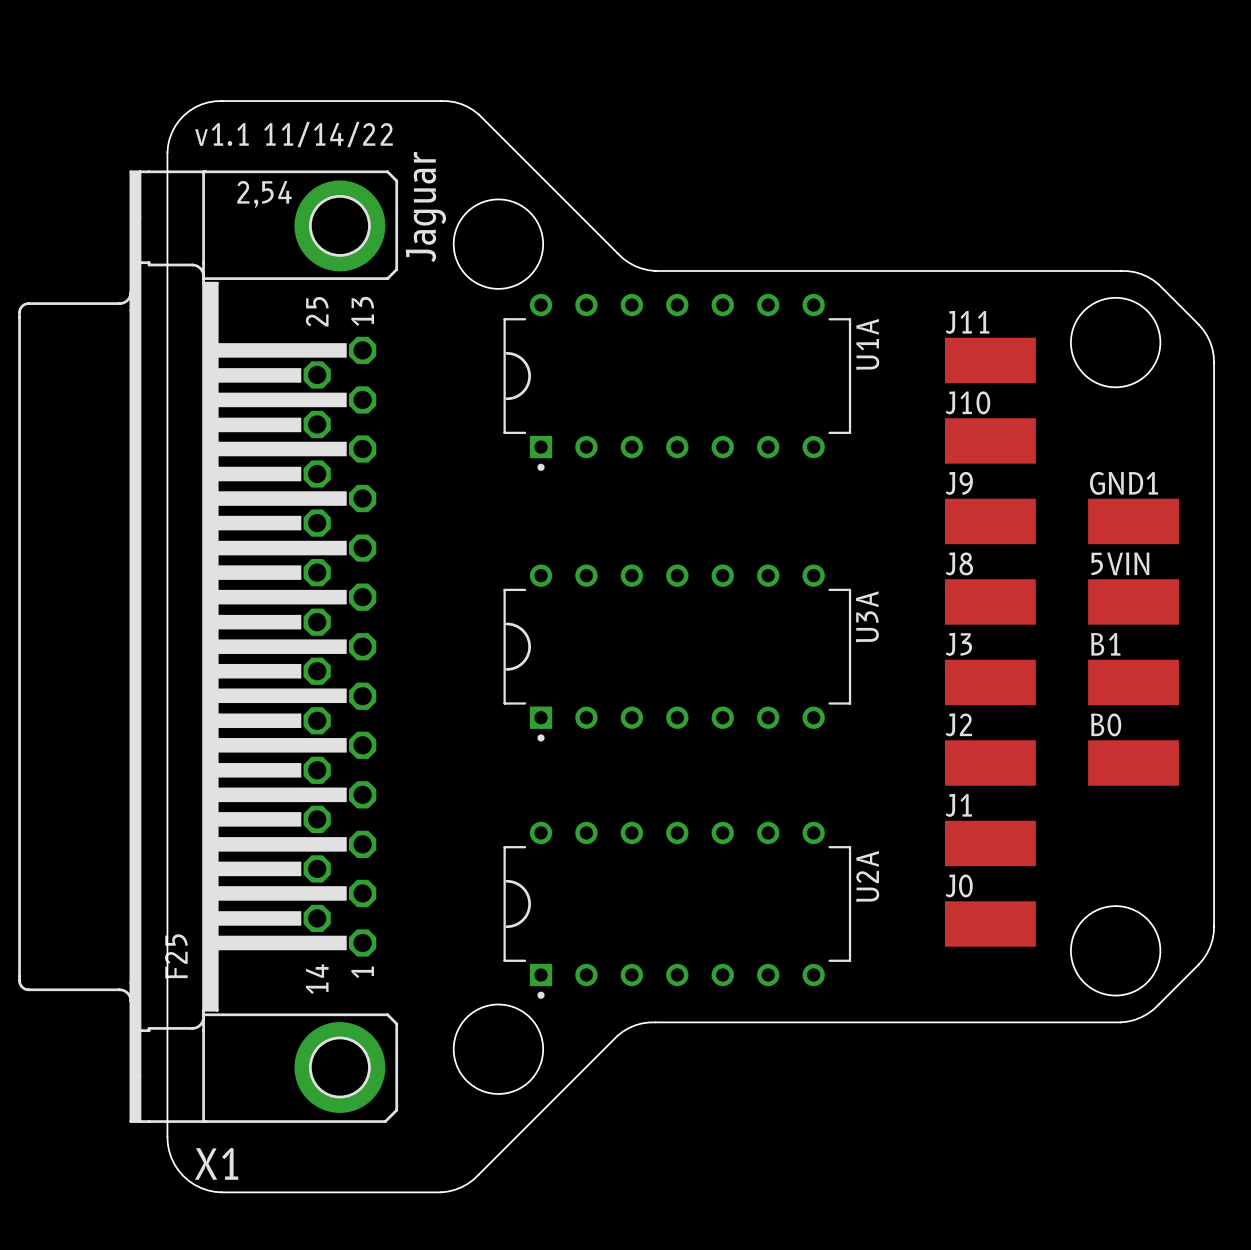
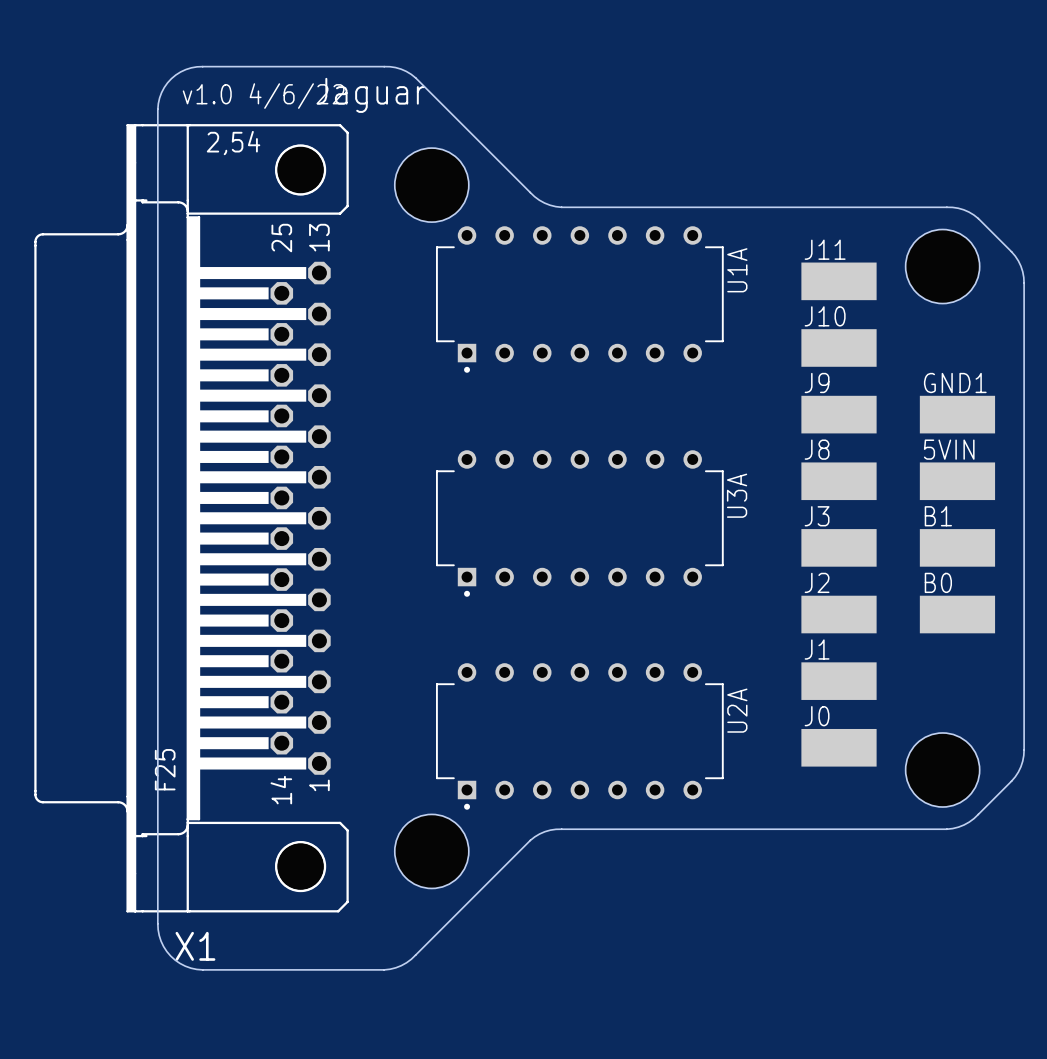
text: v1.1 11/14/22 (294, 134) -> v1.0 4/6/22 (263, 96)
X1 footprint: [18, 170, 399, 1123] -> [34, 124, 349, 913]
text rotation: 0° (425, 206) -> 90° clockwise (371, 95)
U1A footprint: [503, 293, 852, 471] -> [436, 226, 724, 373]
U3A footprint: [503, 564, 852, 742] -> [436, 450, 724, 597]
U2A footprint: [503, 821, 852, 999] -> [436, 663, 724, 810]

